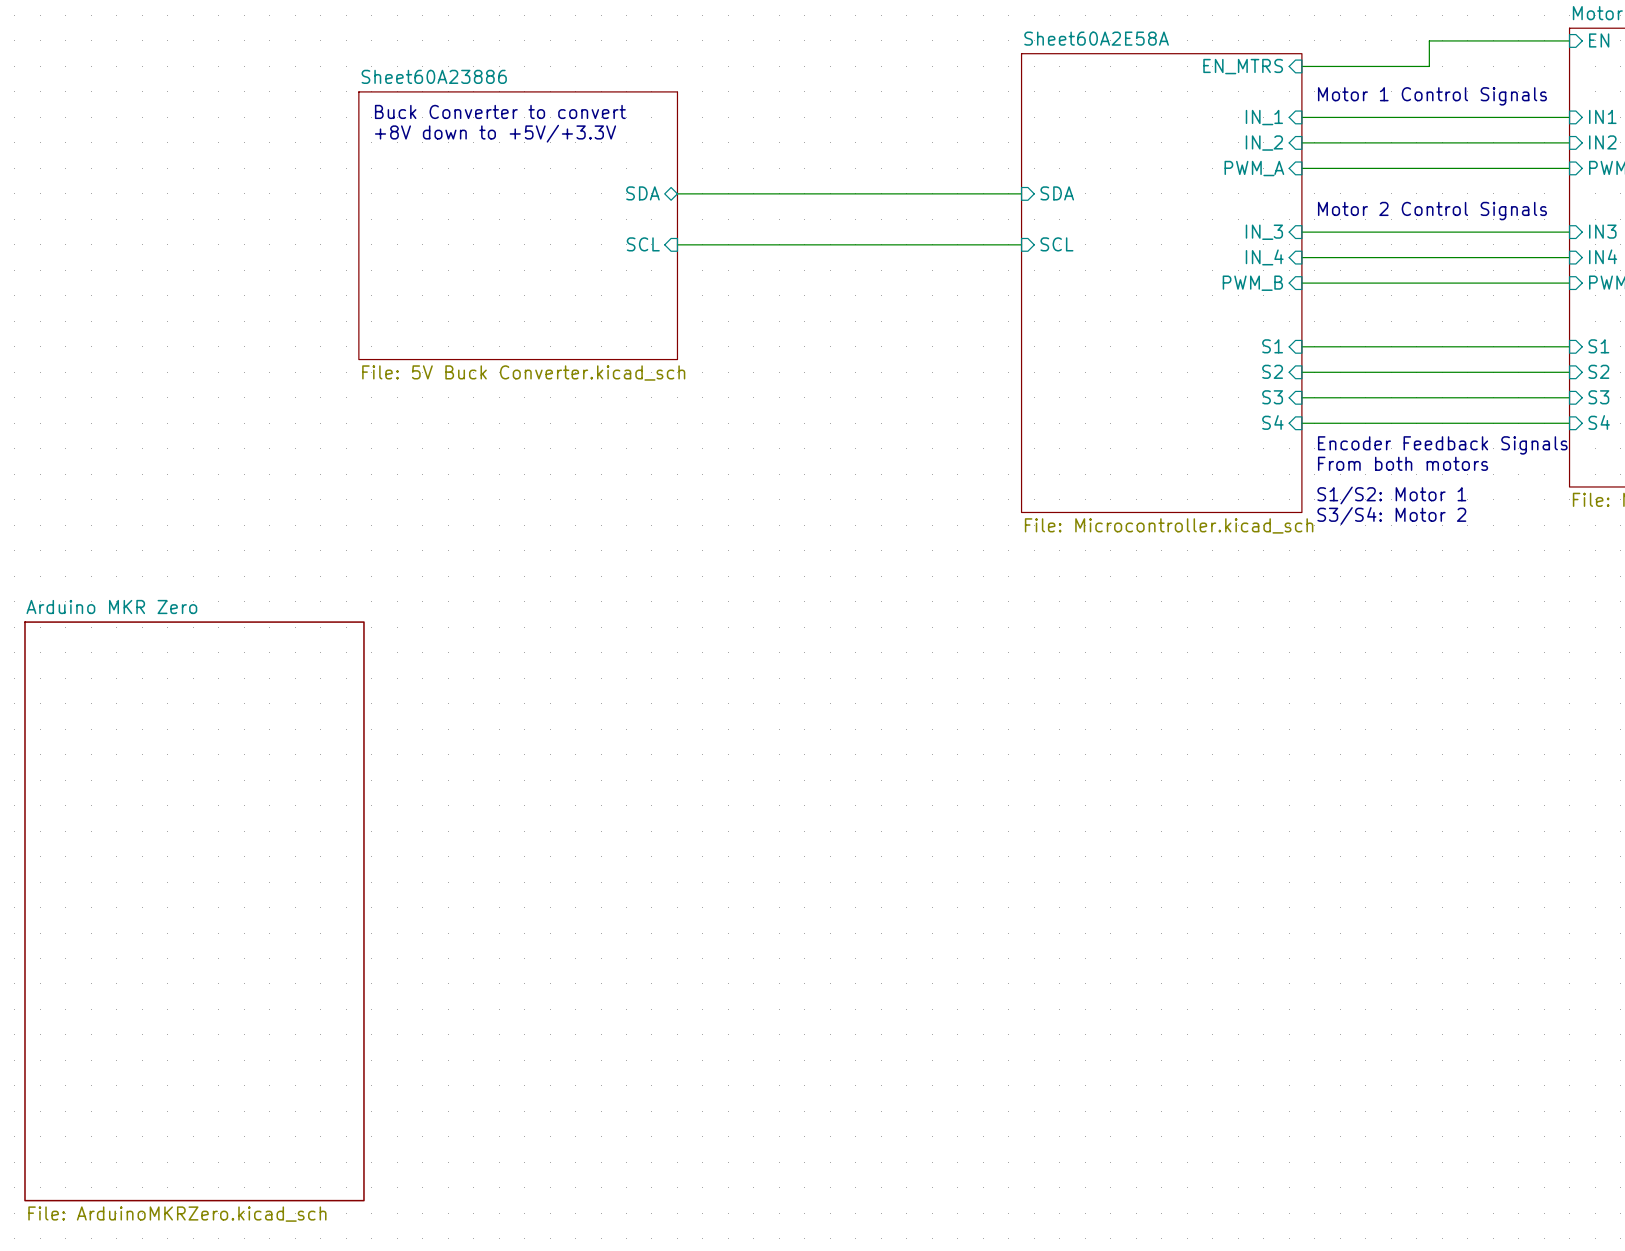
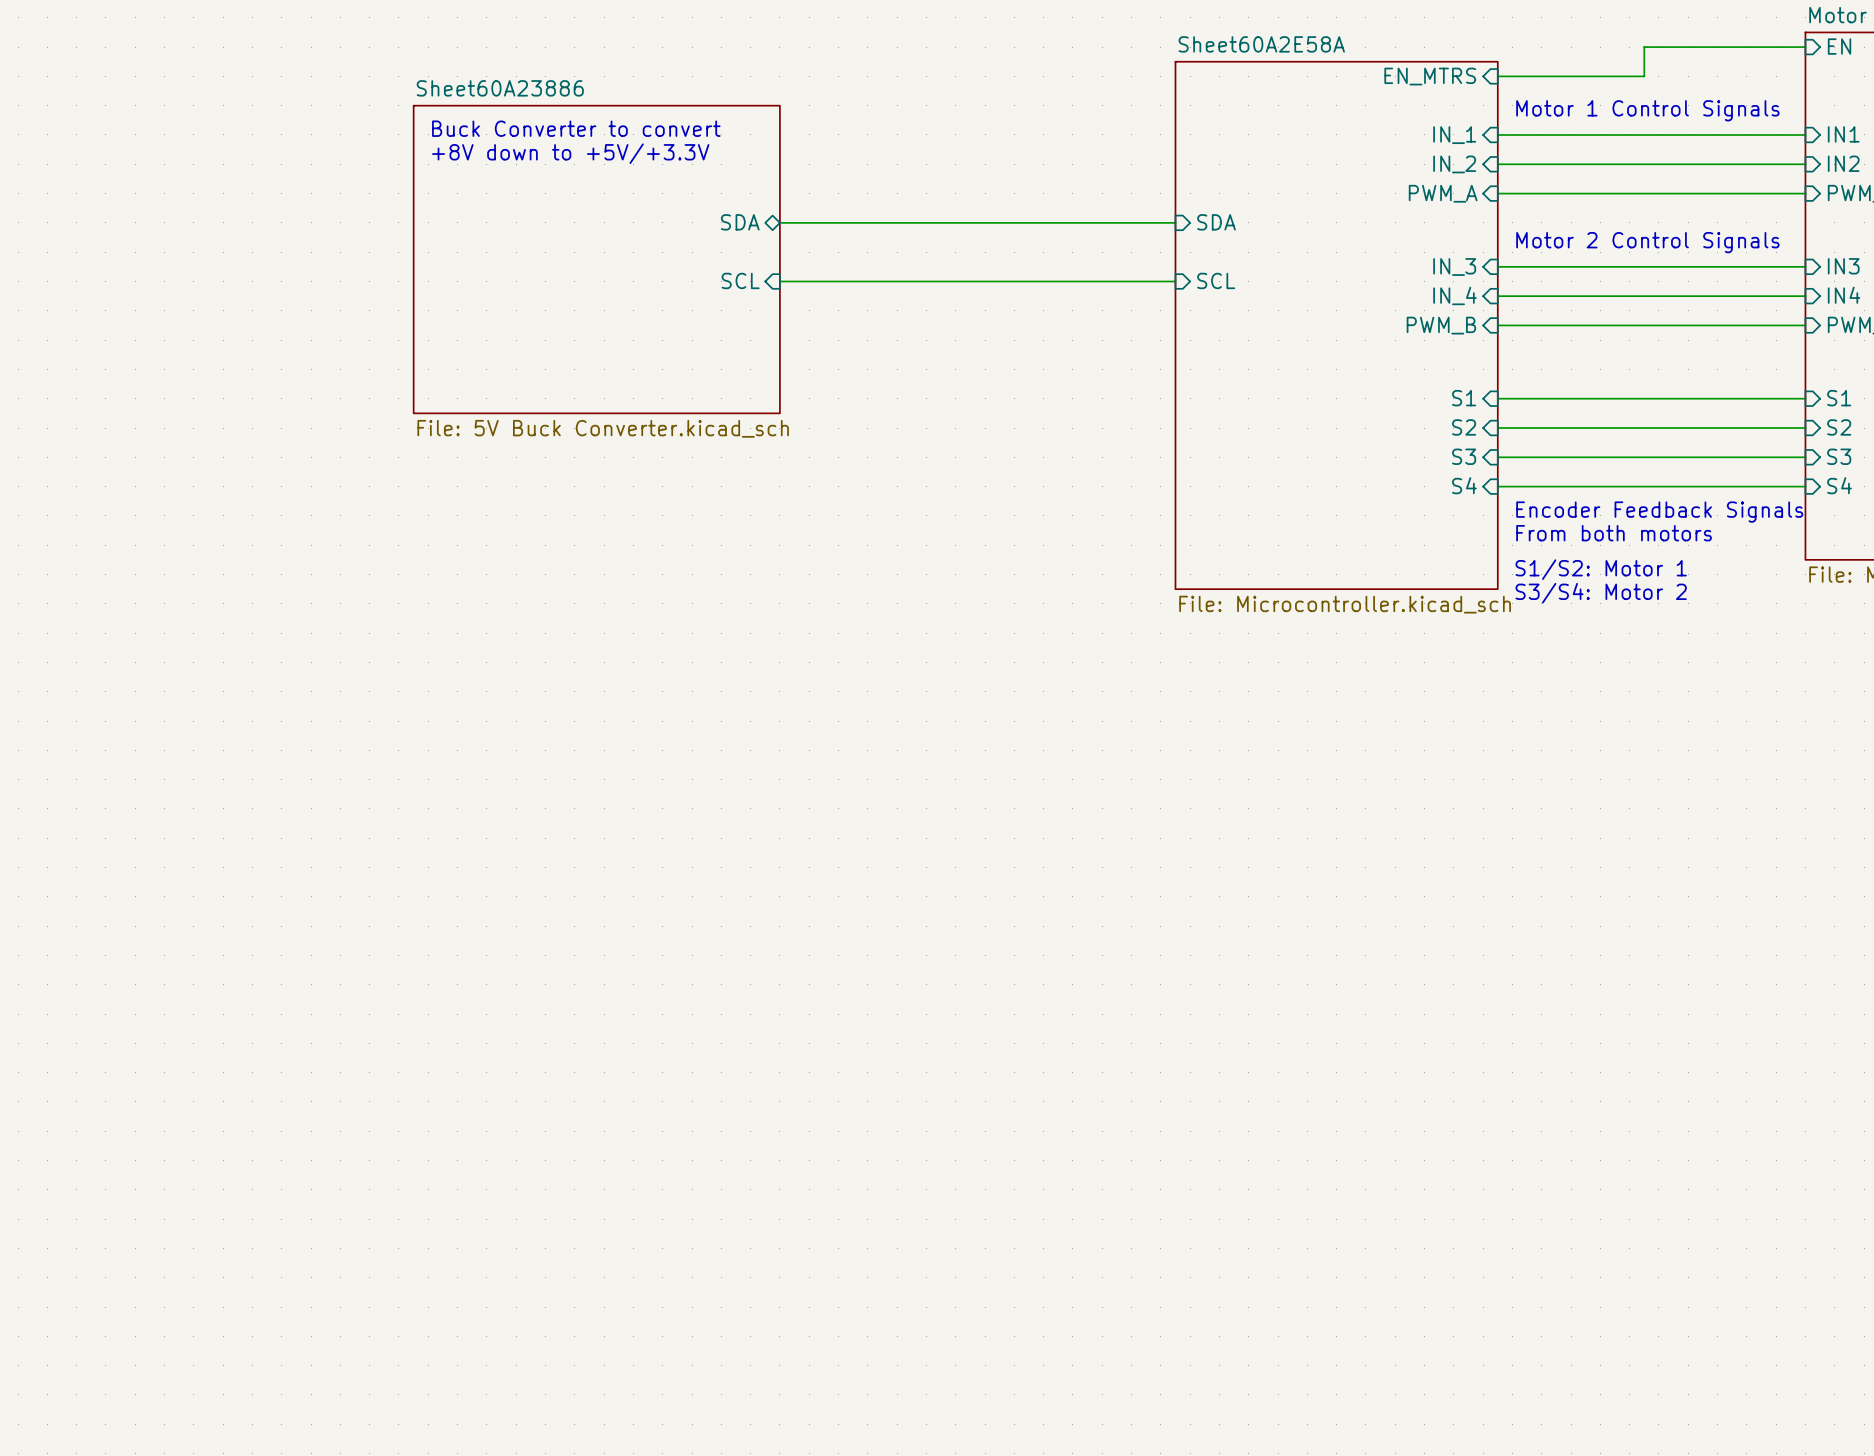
sheet Arduino MKR Zero: File: ArduinoMKRZero.kicad_sch (194, 911) -> none

